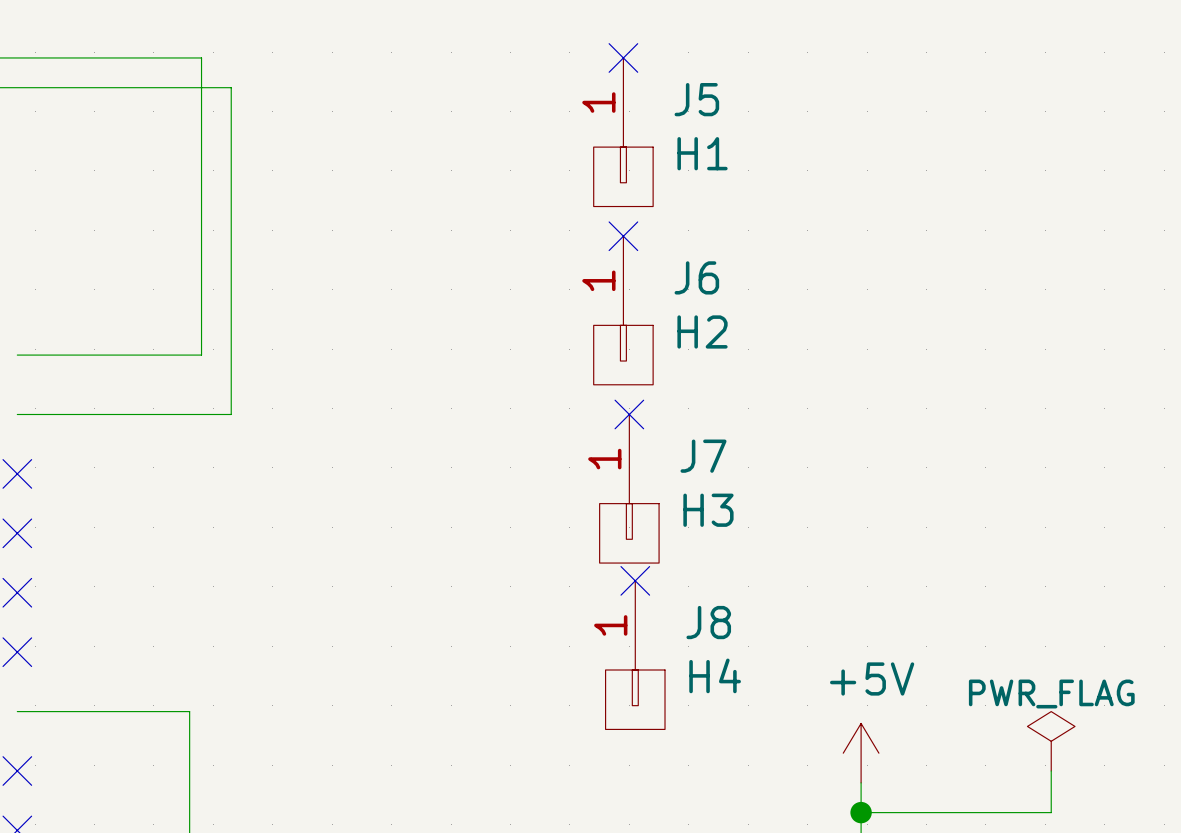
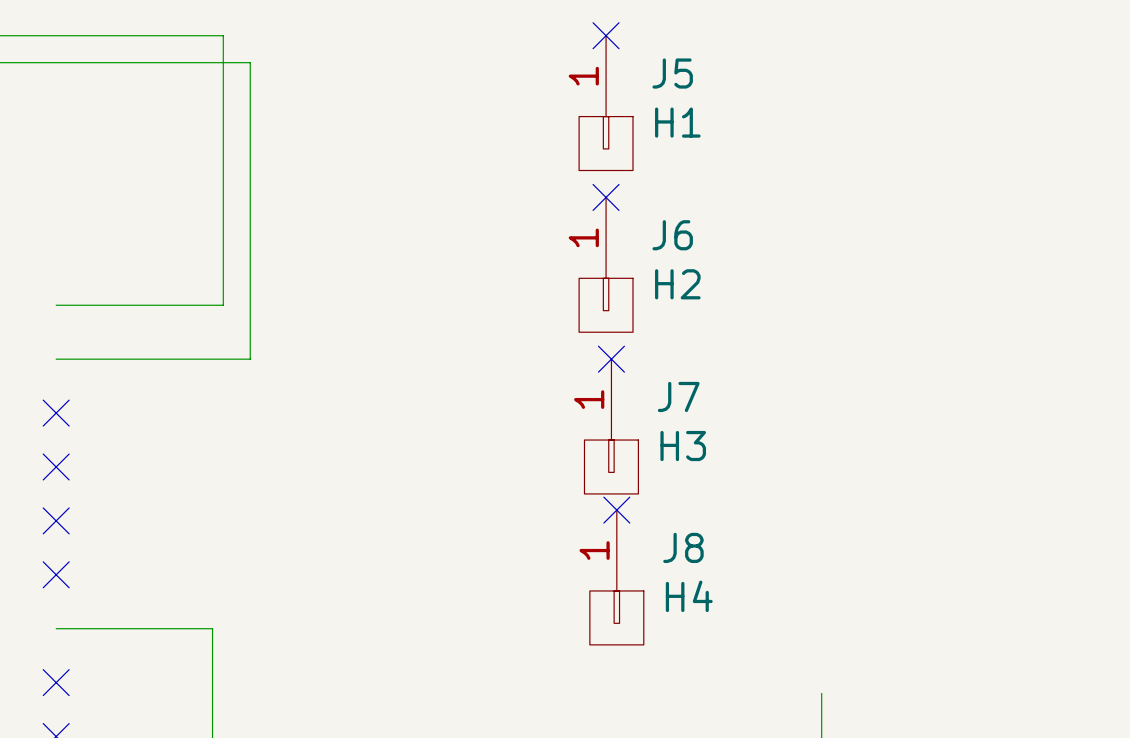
power symbol: PWR_FLAG (1051, 741) -> none
power symbol: +5V (861, 753) -> none
wire: (1051, 771) (1051, 812) (861, 812) -> none
junction: (861, 812) -> none

